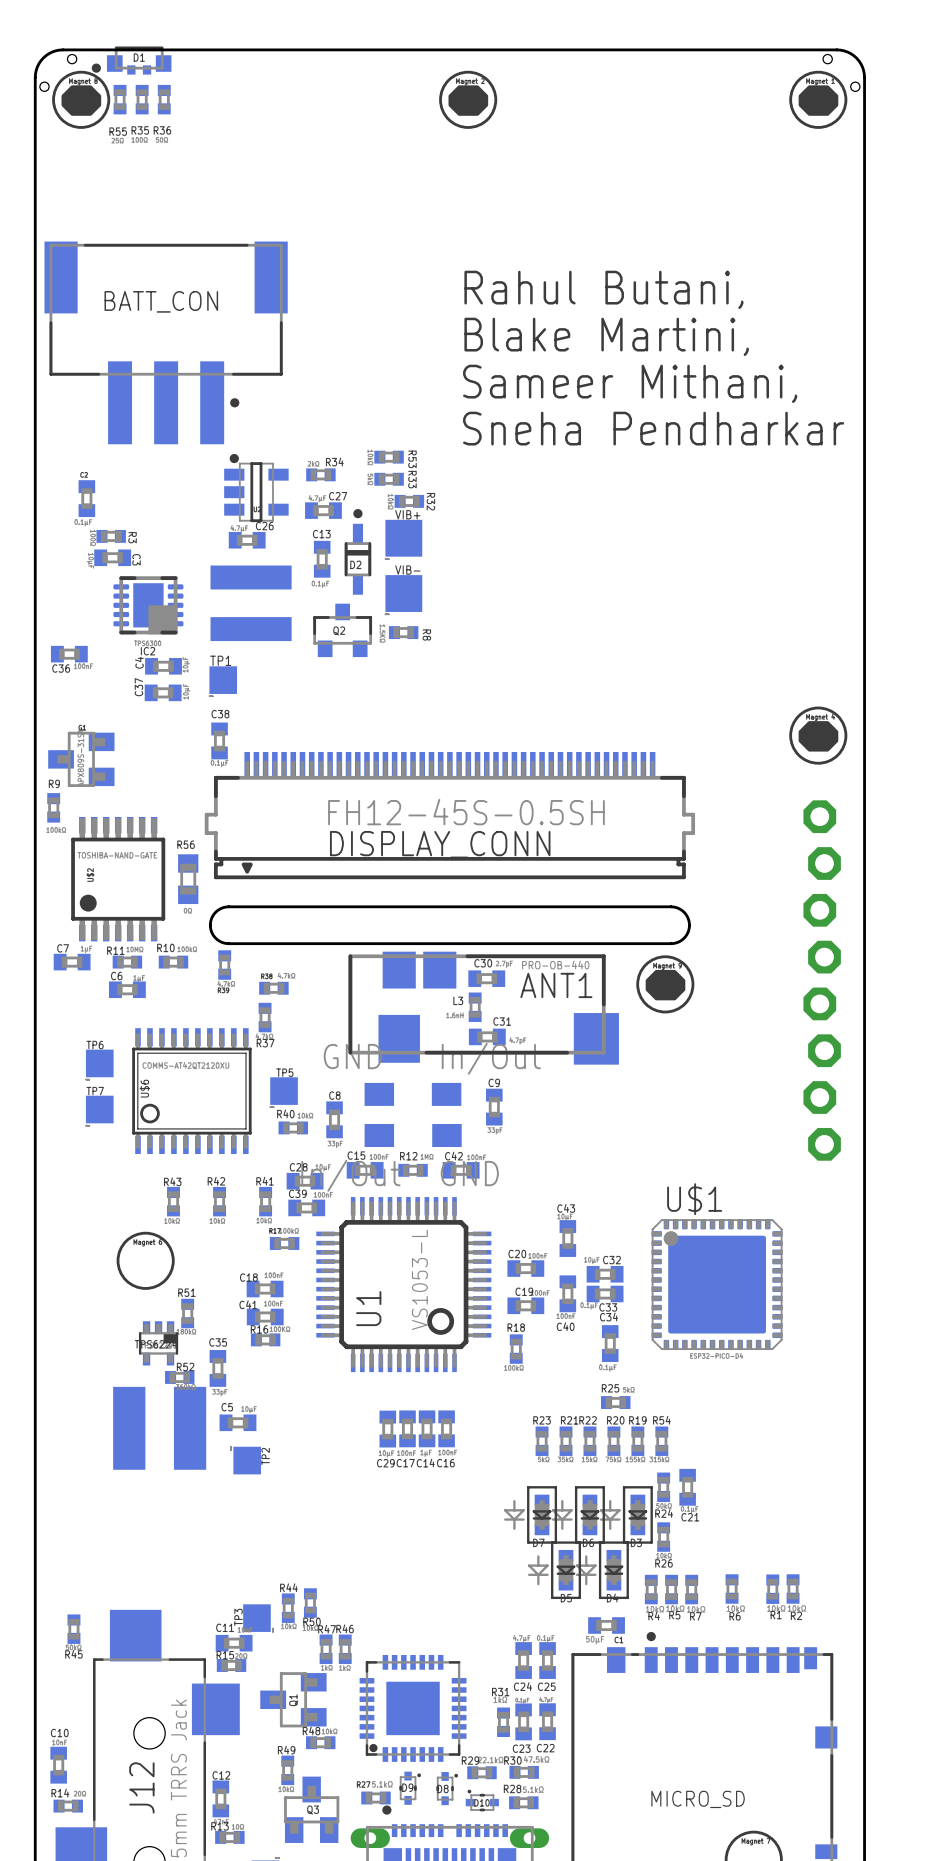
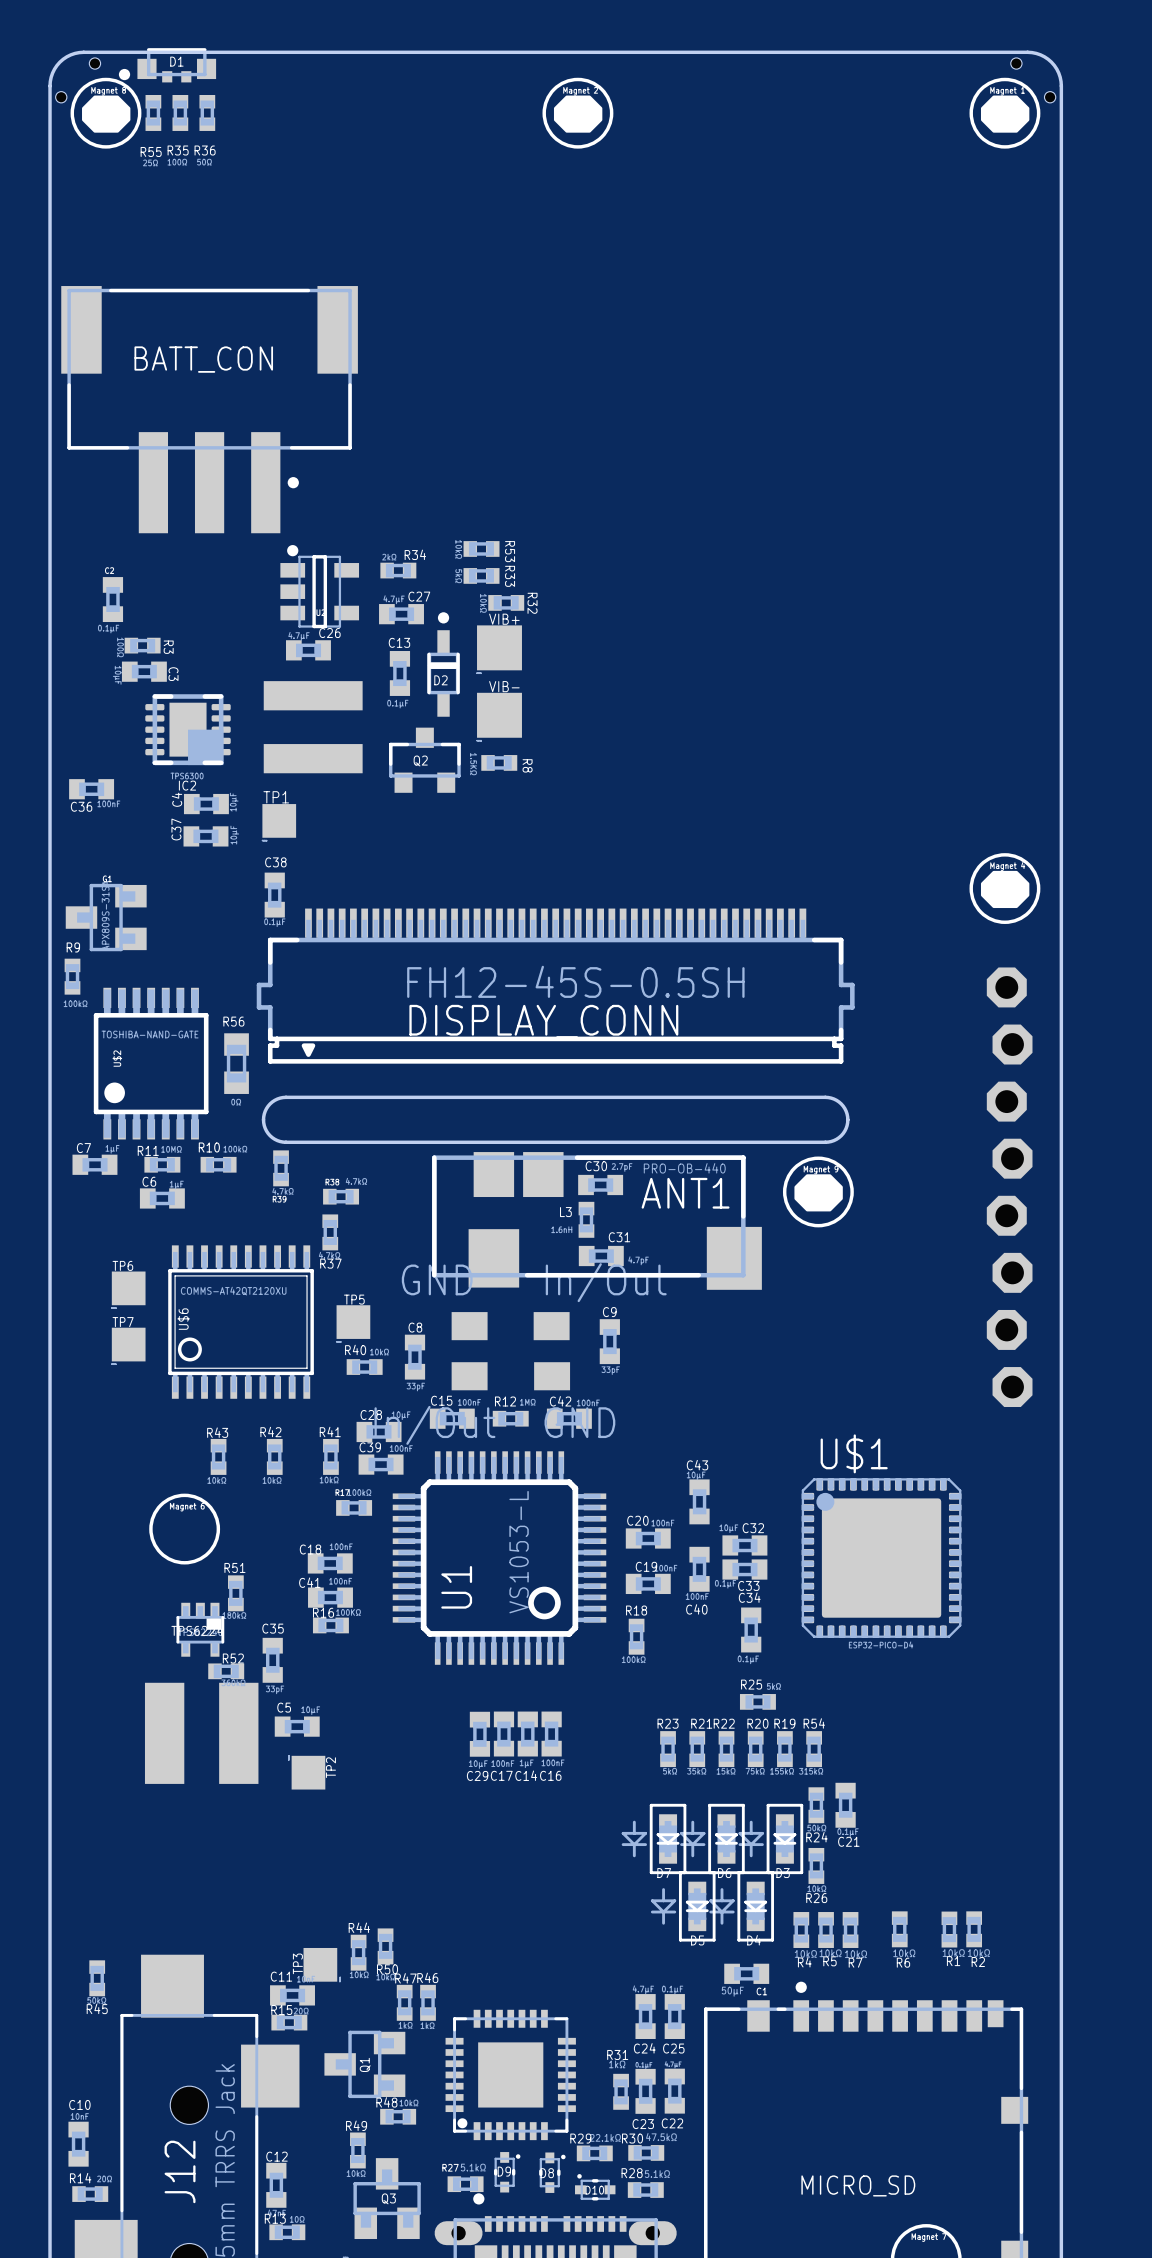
text: Rahul Butani, (603, 289) -> none
text: Blake Martini, (606, 336) -> none
text: Sameer Mithani, (630, 383) -> none
text: Sneha Pendharkar (653, 428) -> none

